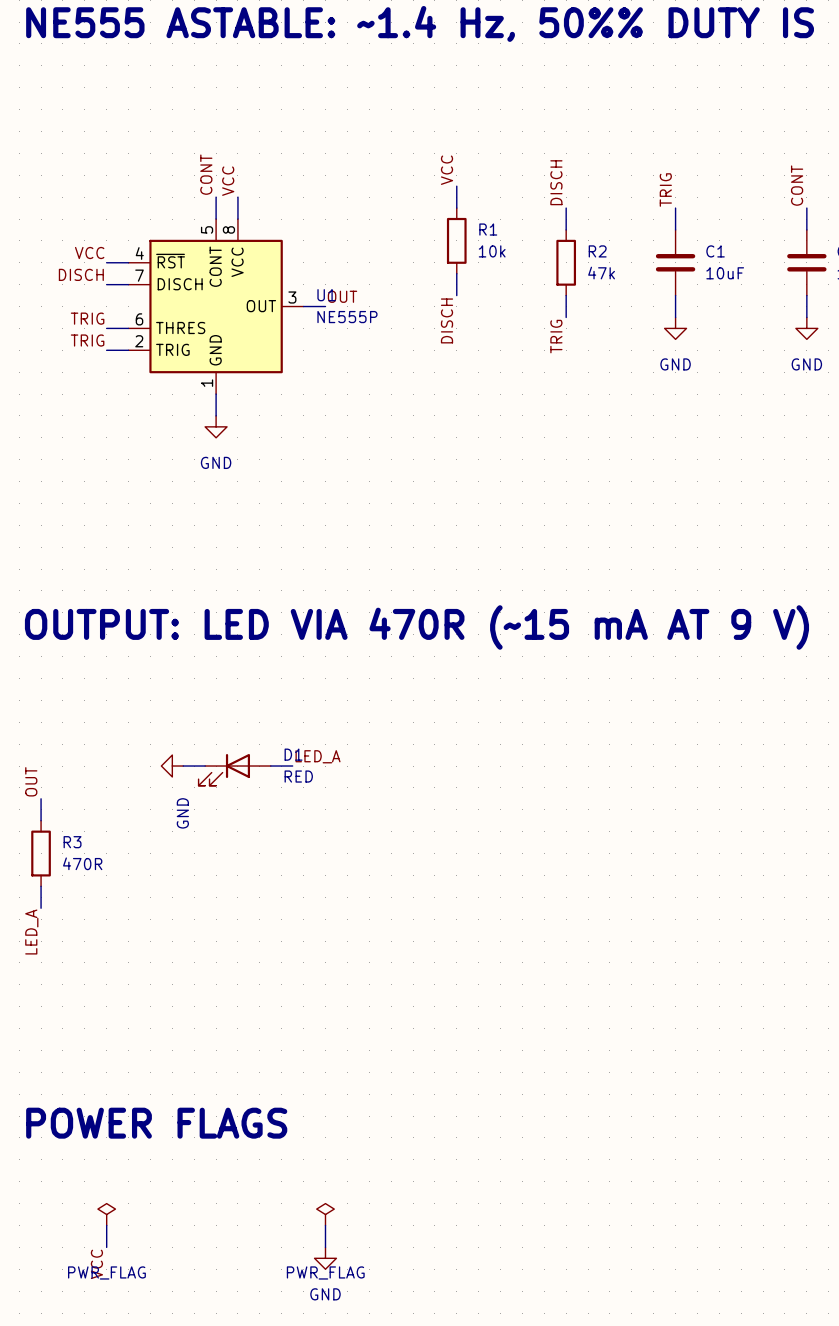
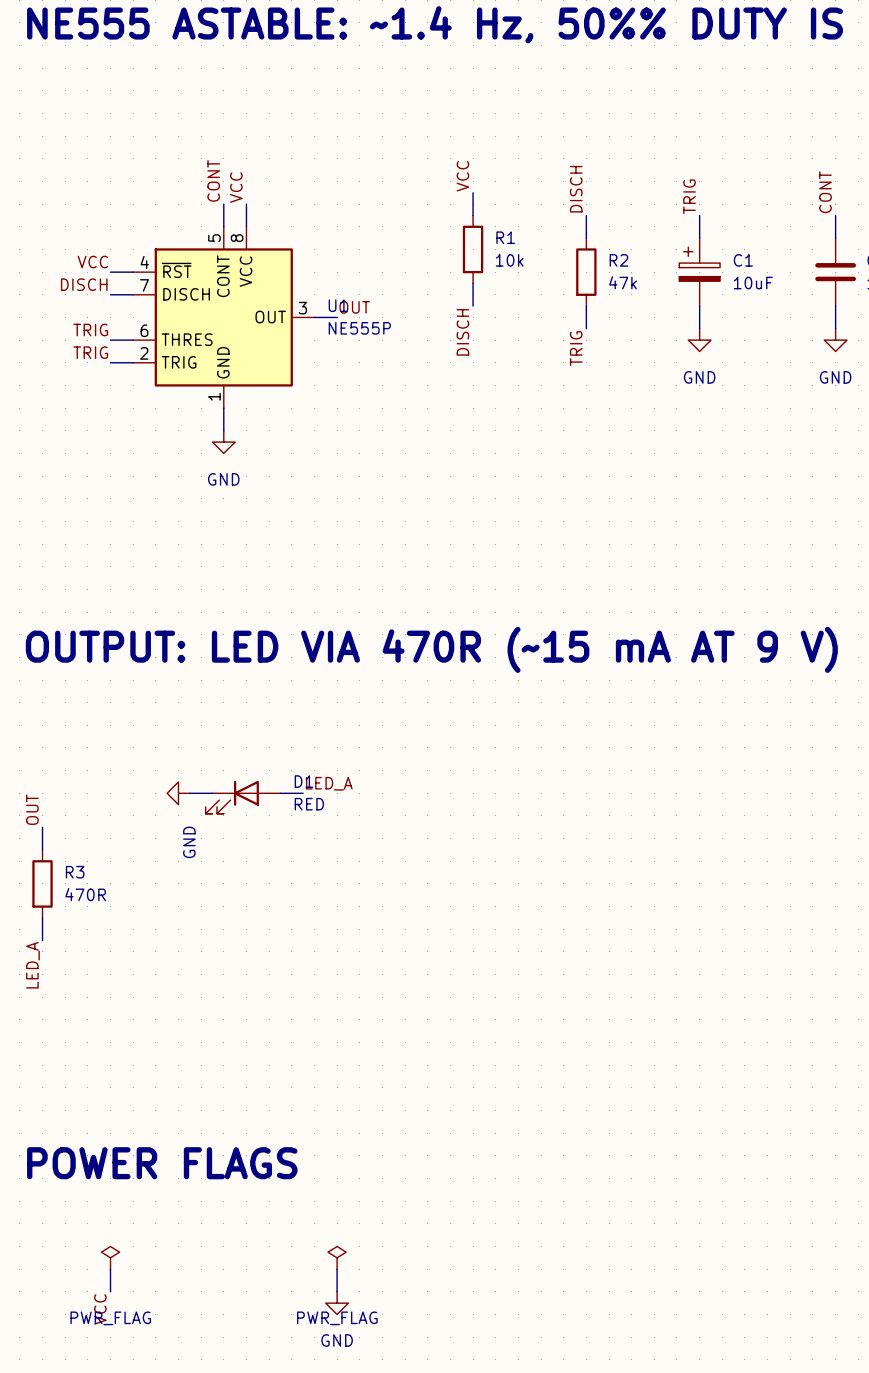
C1 symbol: [655, 229, 696, 296] -> [679, 238, 721, 307]

